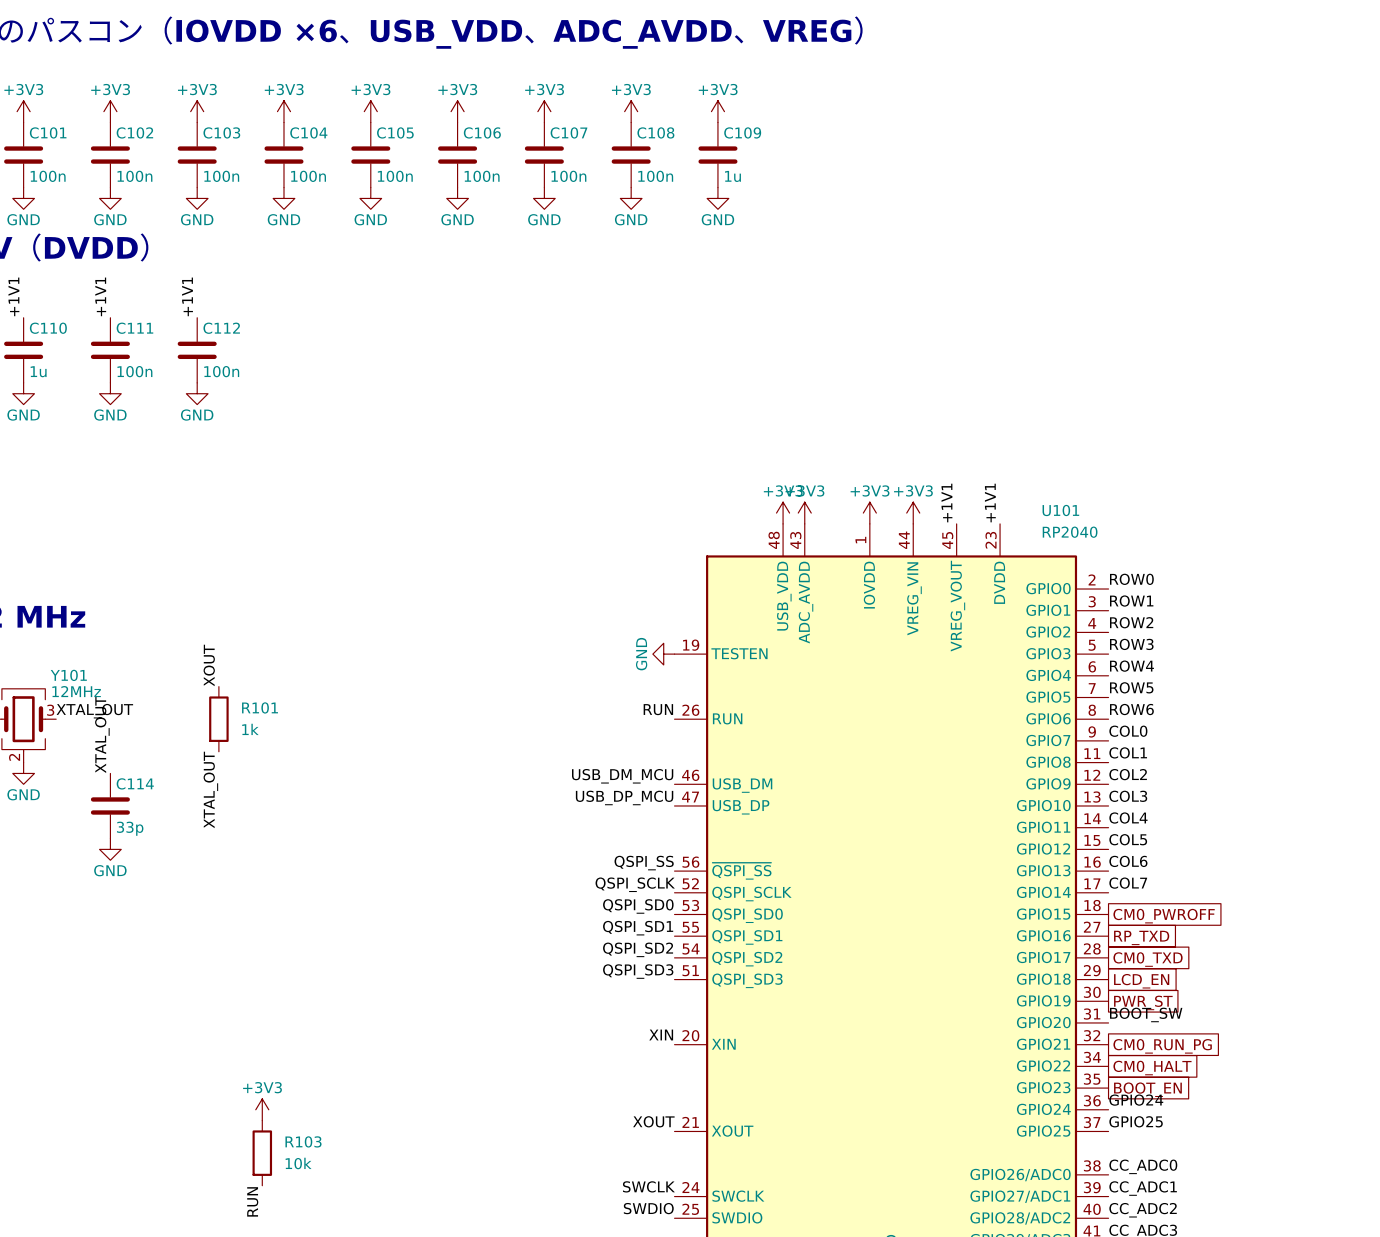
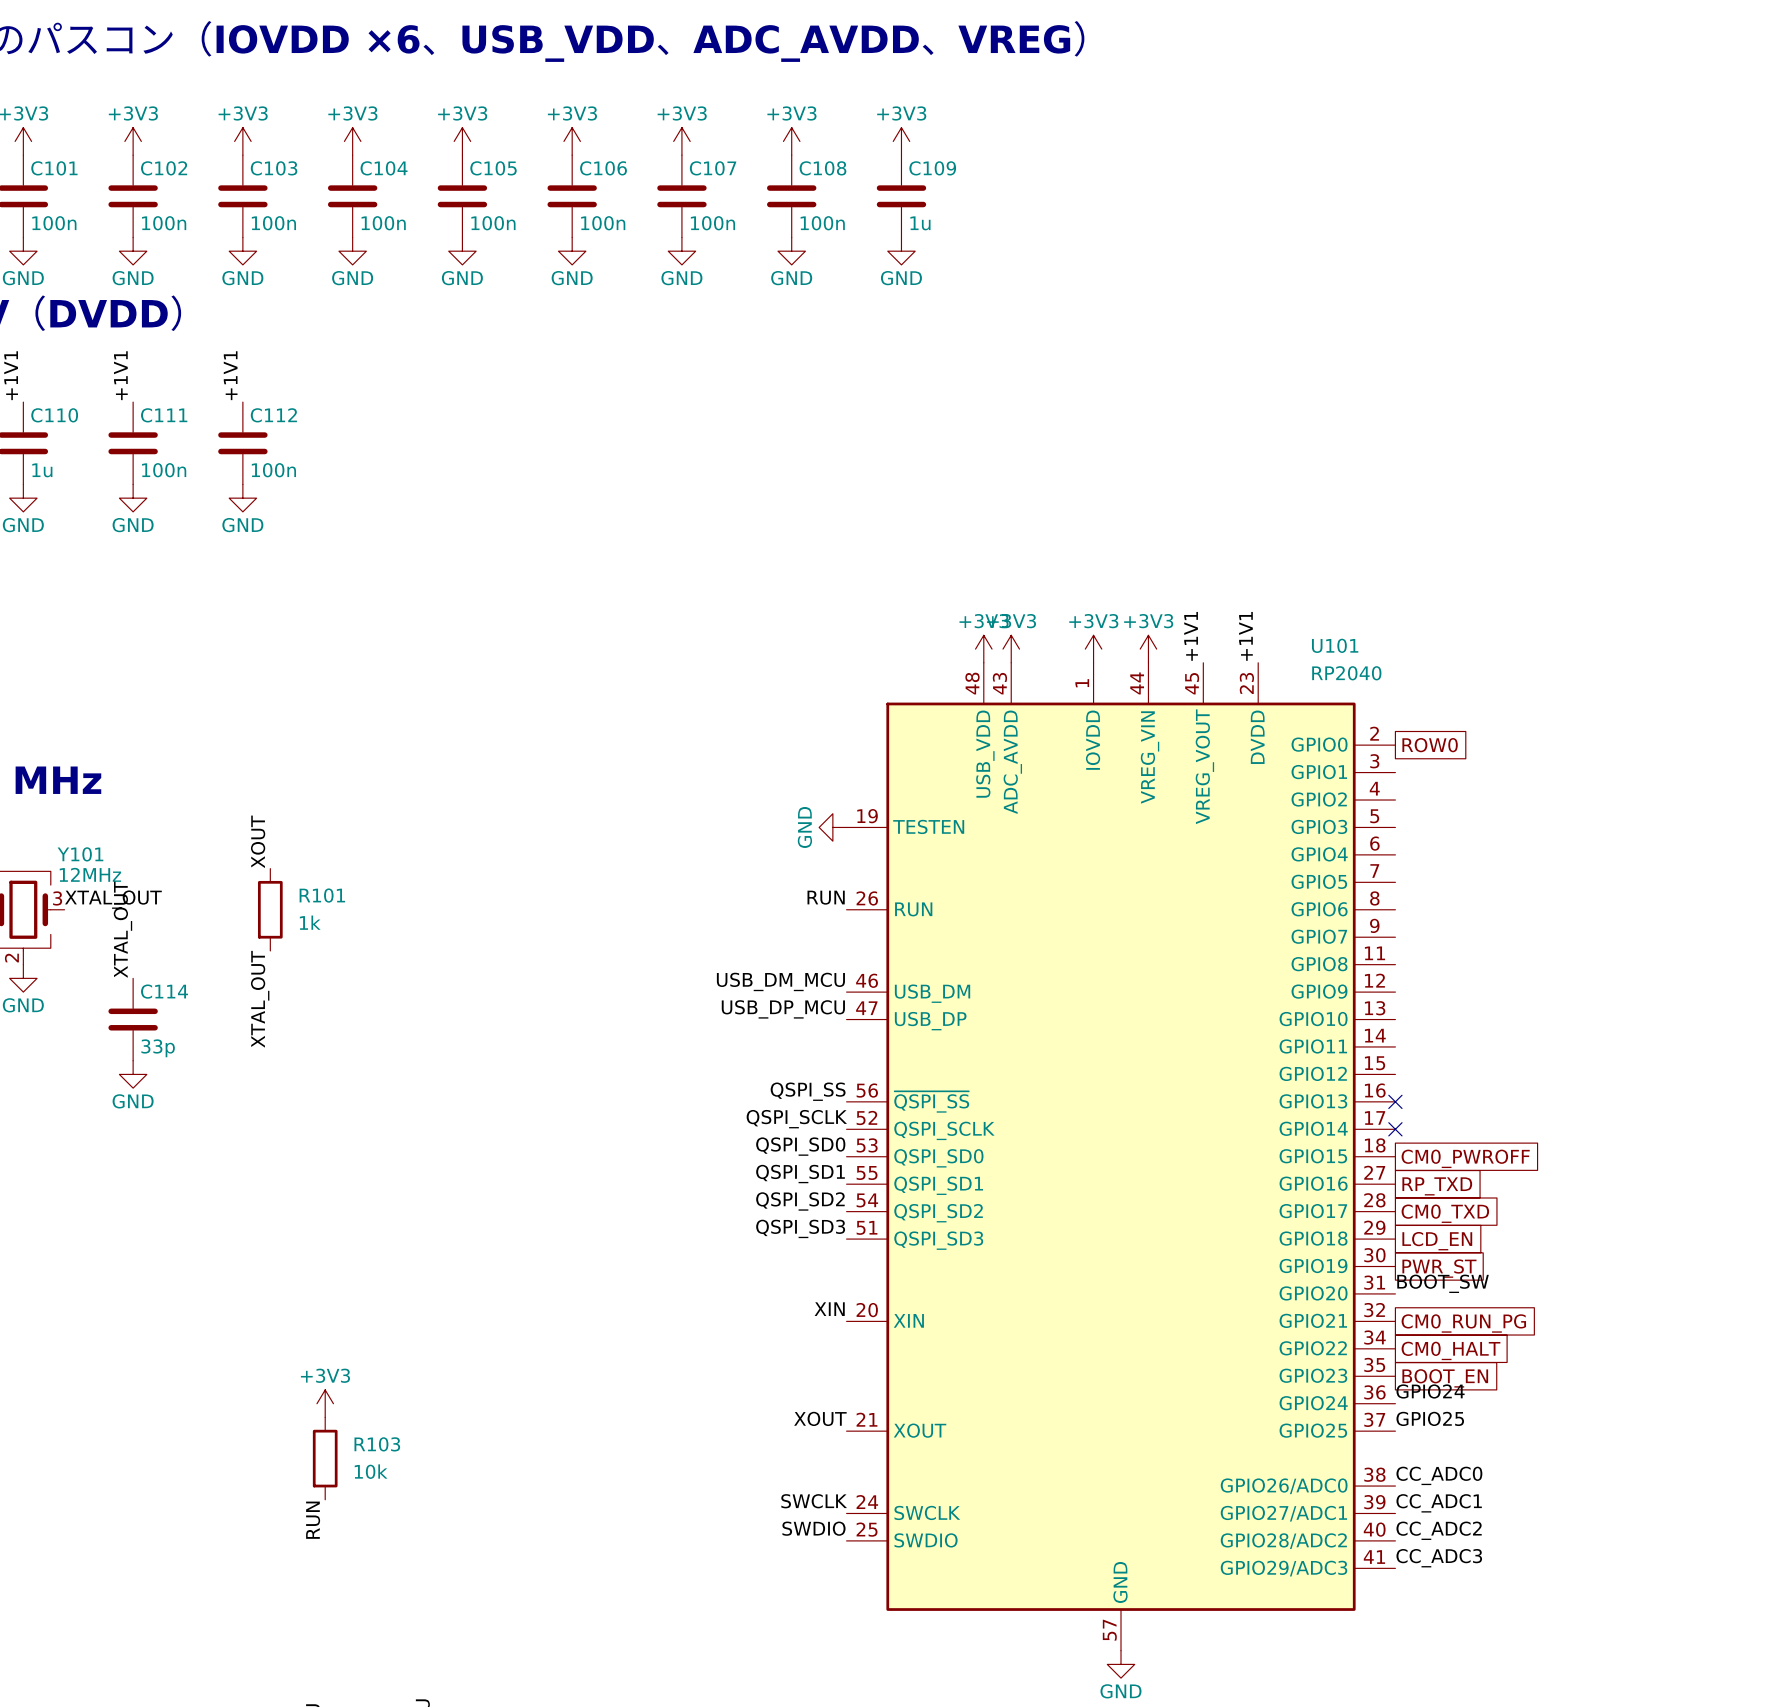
label: ROW0 (1131, 579) -> none
global label: none -> ROW0 (1430, 745)
label: ROW1 (1131, 601) -> none
label: ROW2 (1131, 622) -> none
label: ROW3 (1131, 644) -> none
label: ROW4 (1131, 666) -> none
label: ROW5 (1131, 687) -> none
label: ROW6 (1131, 709) -> none
label: COL0 (1128, 731) -> none
label: COL1 (1128, 752) -> none
label: COL2 (1128, 774) -> none
label: COL3 (1128, 796) -> none
label: COL4 (1128, 818) -> none
label: COL5 (1128, 839) -> none
label: COL6 (1128, 861) -> none
no-connect mark: none -> (1395, 1101)
label: COL7 (1128, 883) -> none
no-connect mark: none -> (1395, 1129)

